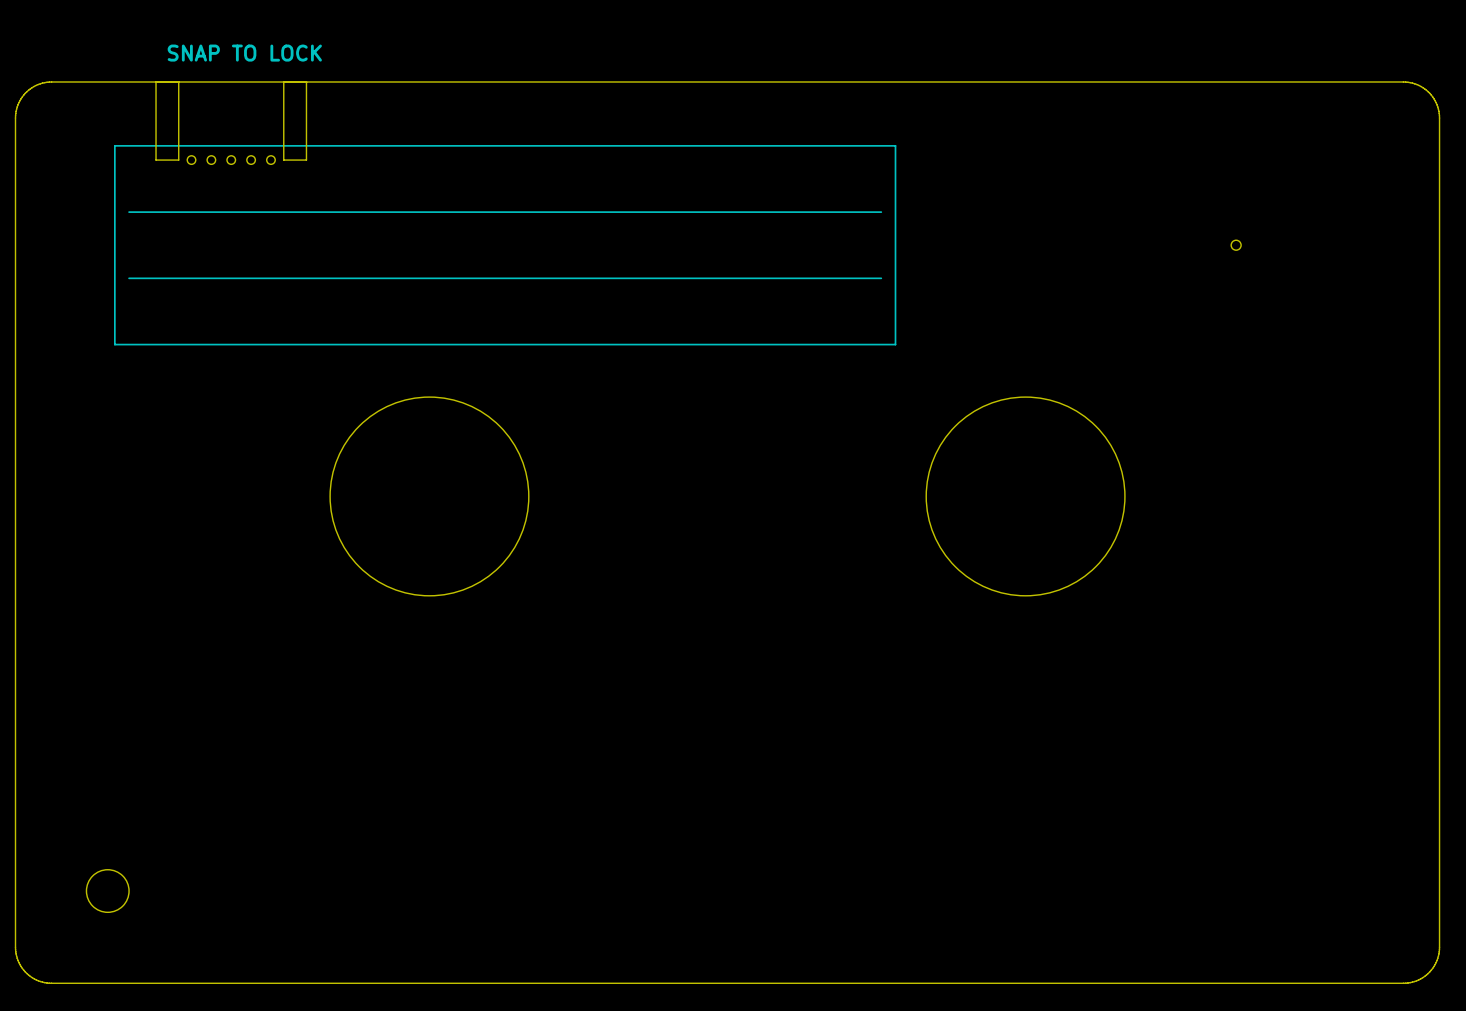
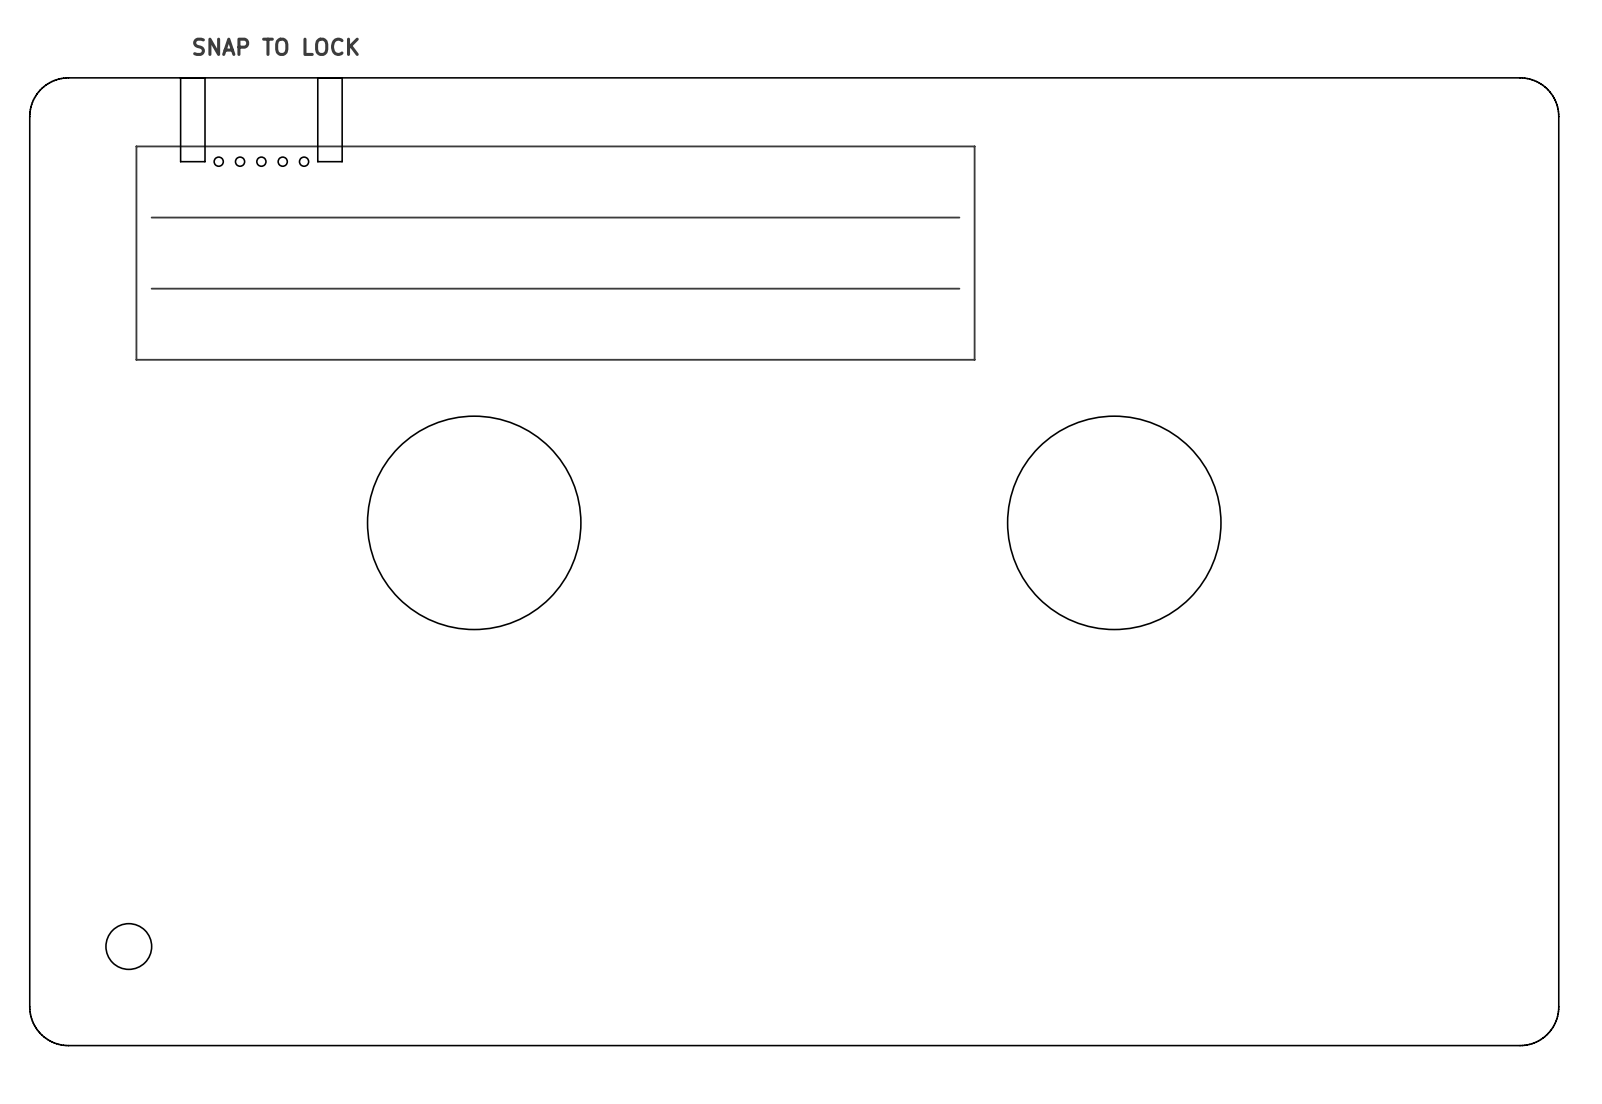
round board edge: [1230, 239, 1242, 251] -> none

